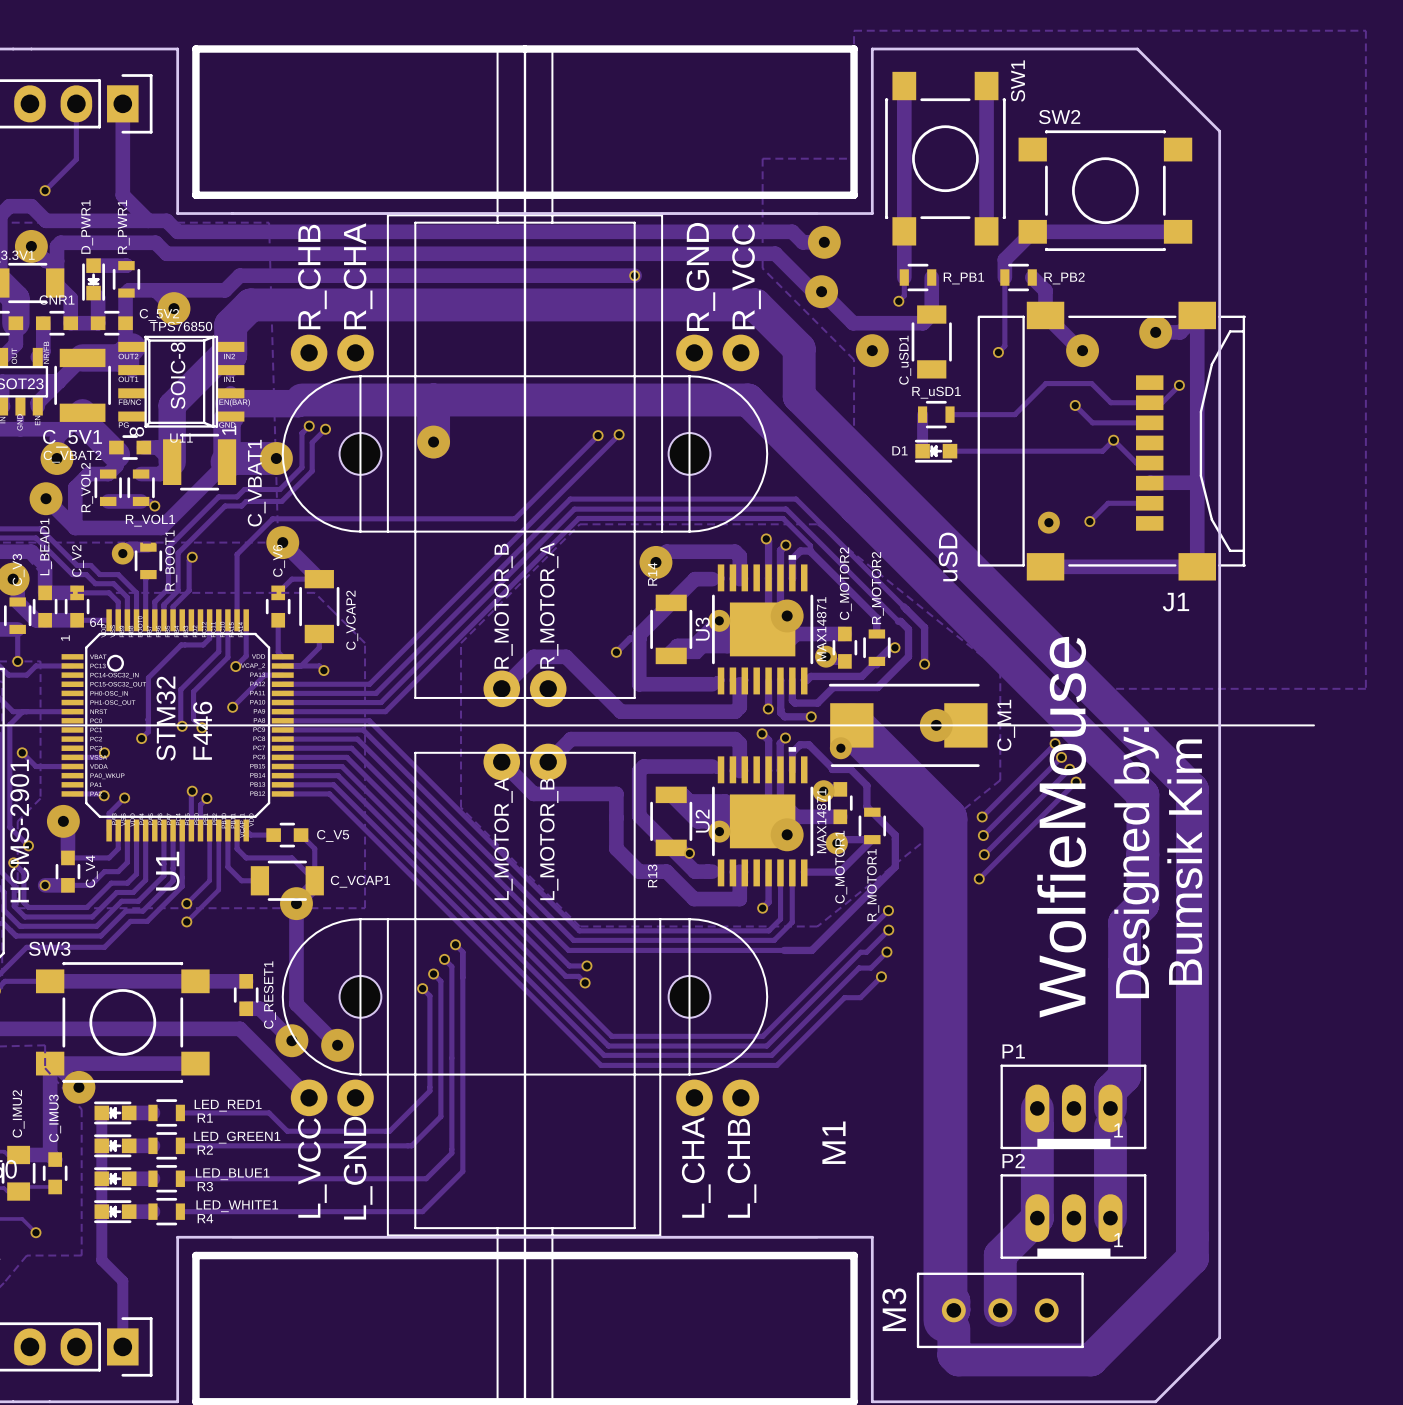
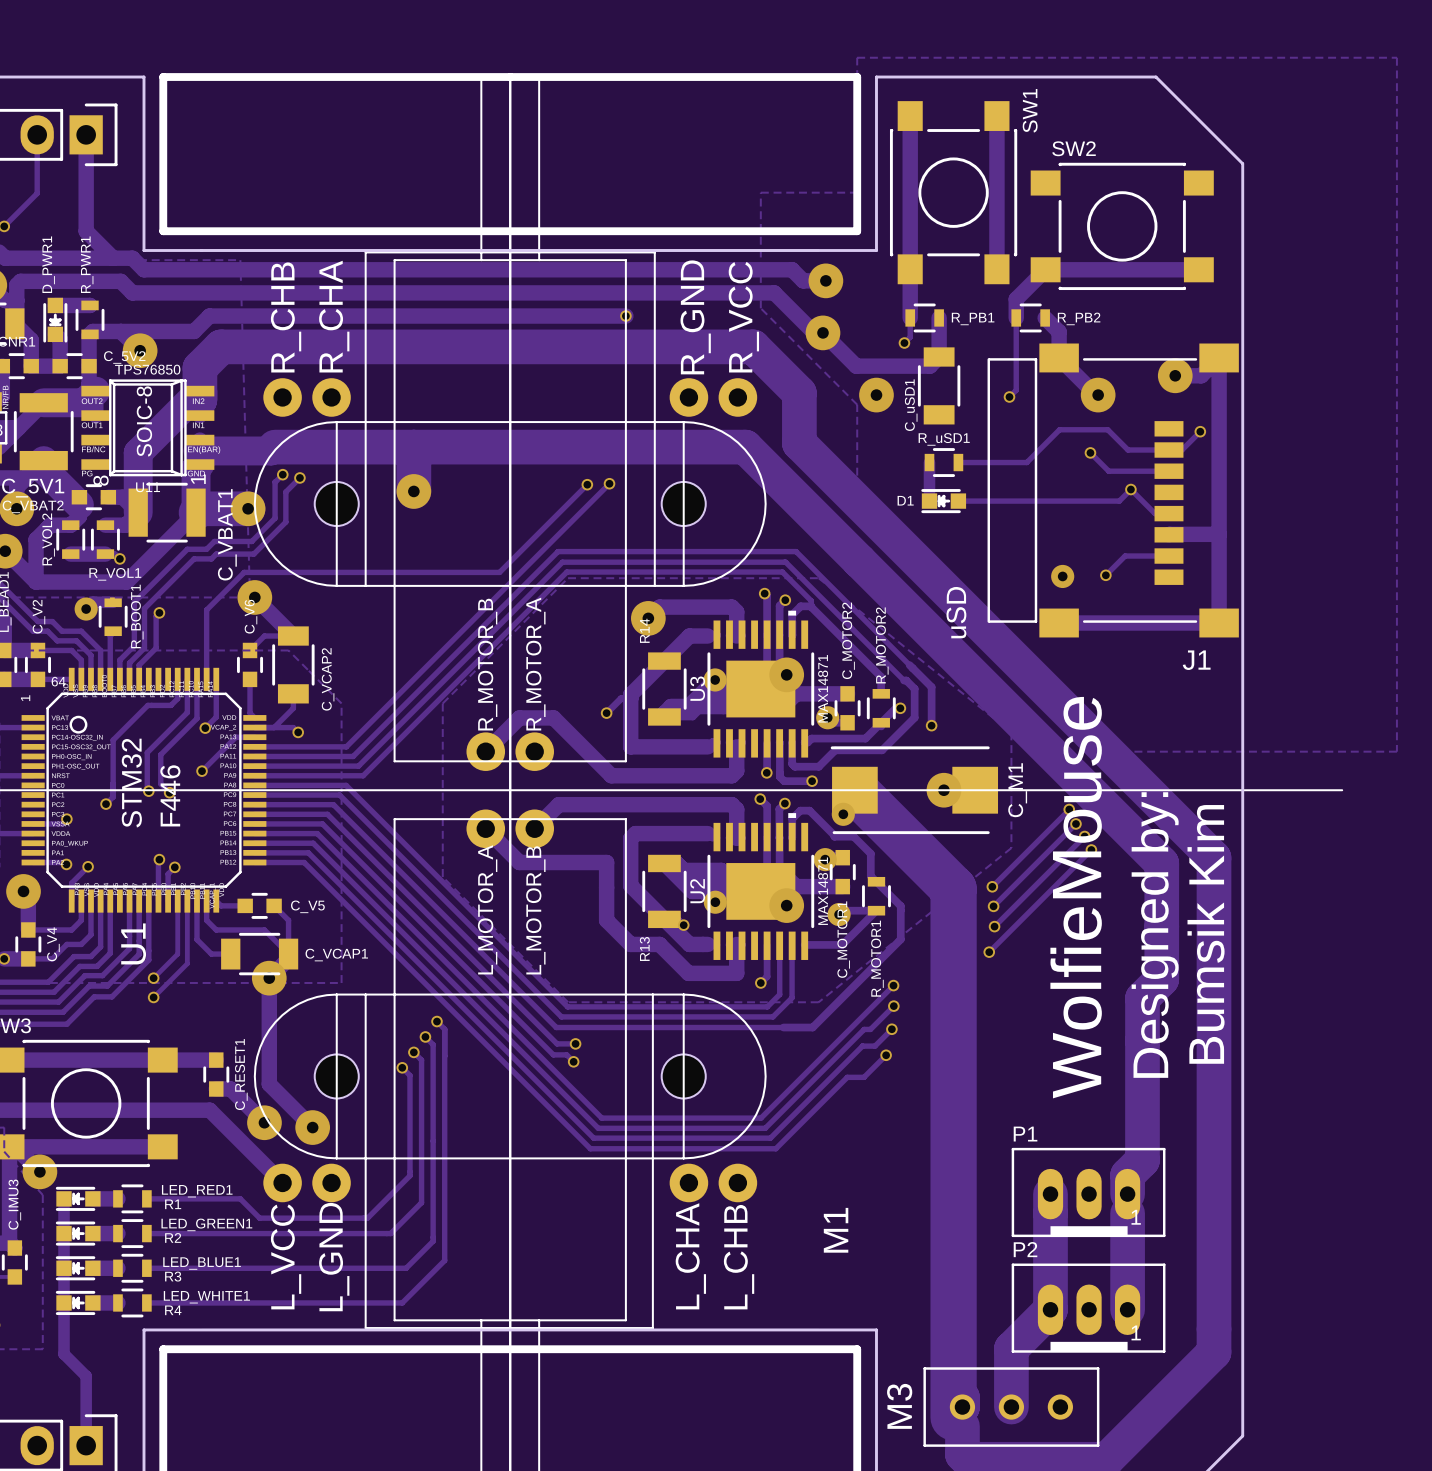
J1 footprint: [977, 301, 1246, 581] -> [987, 343, 1239, 638]

